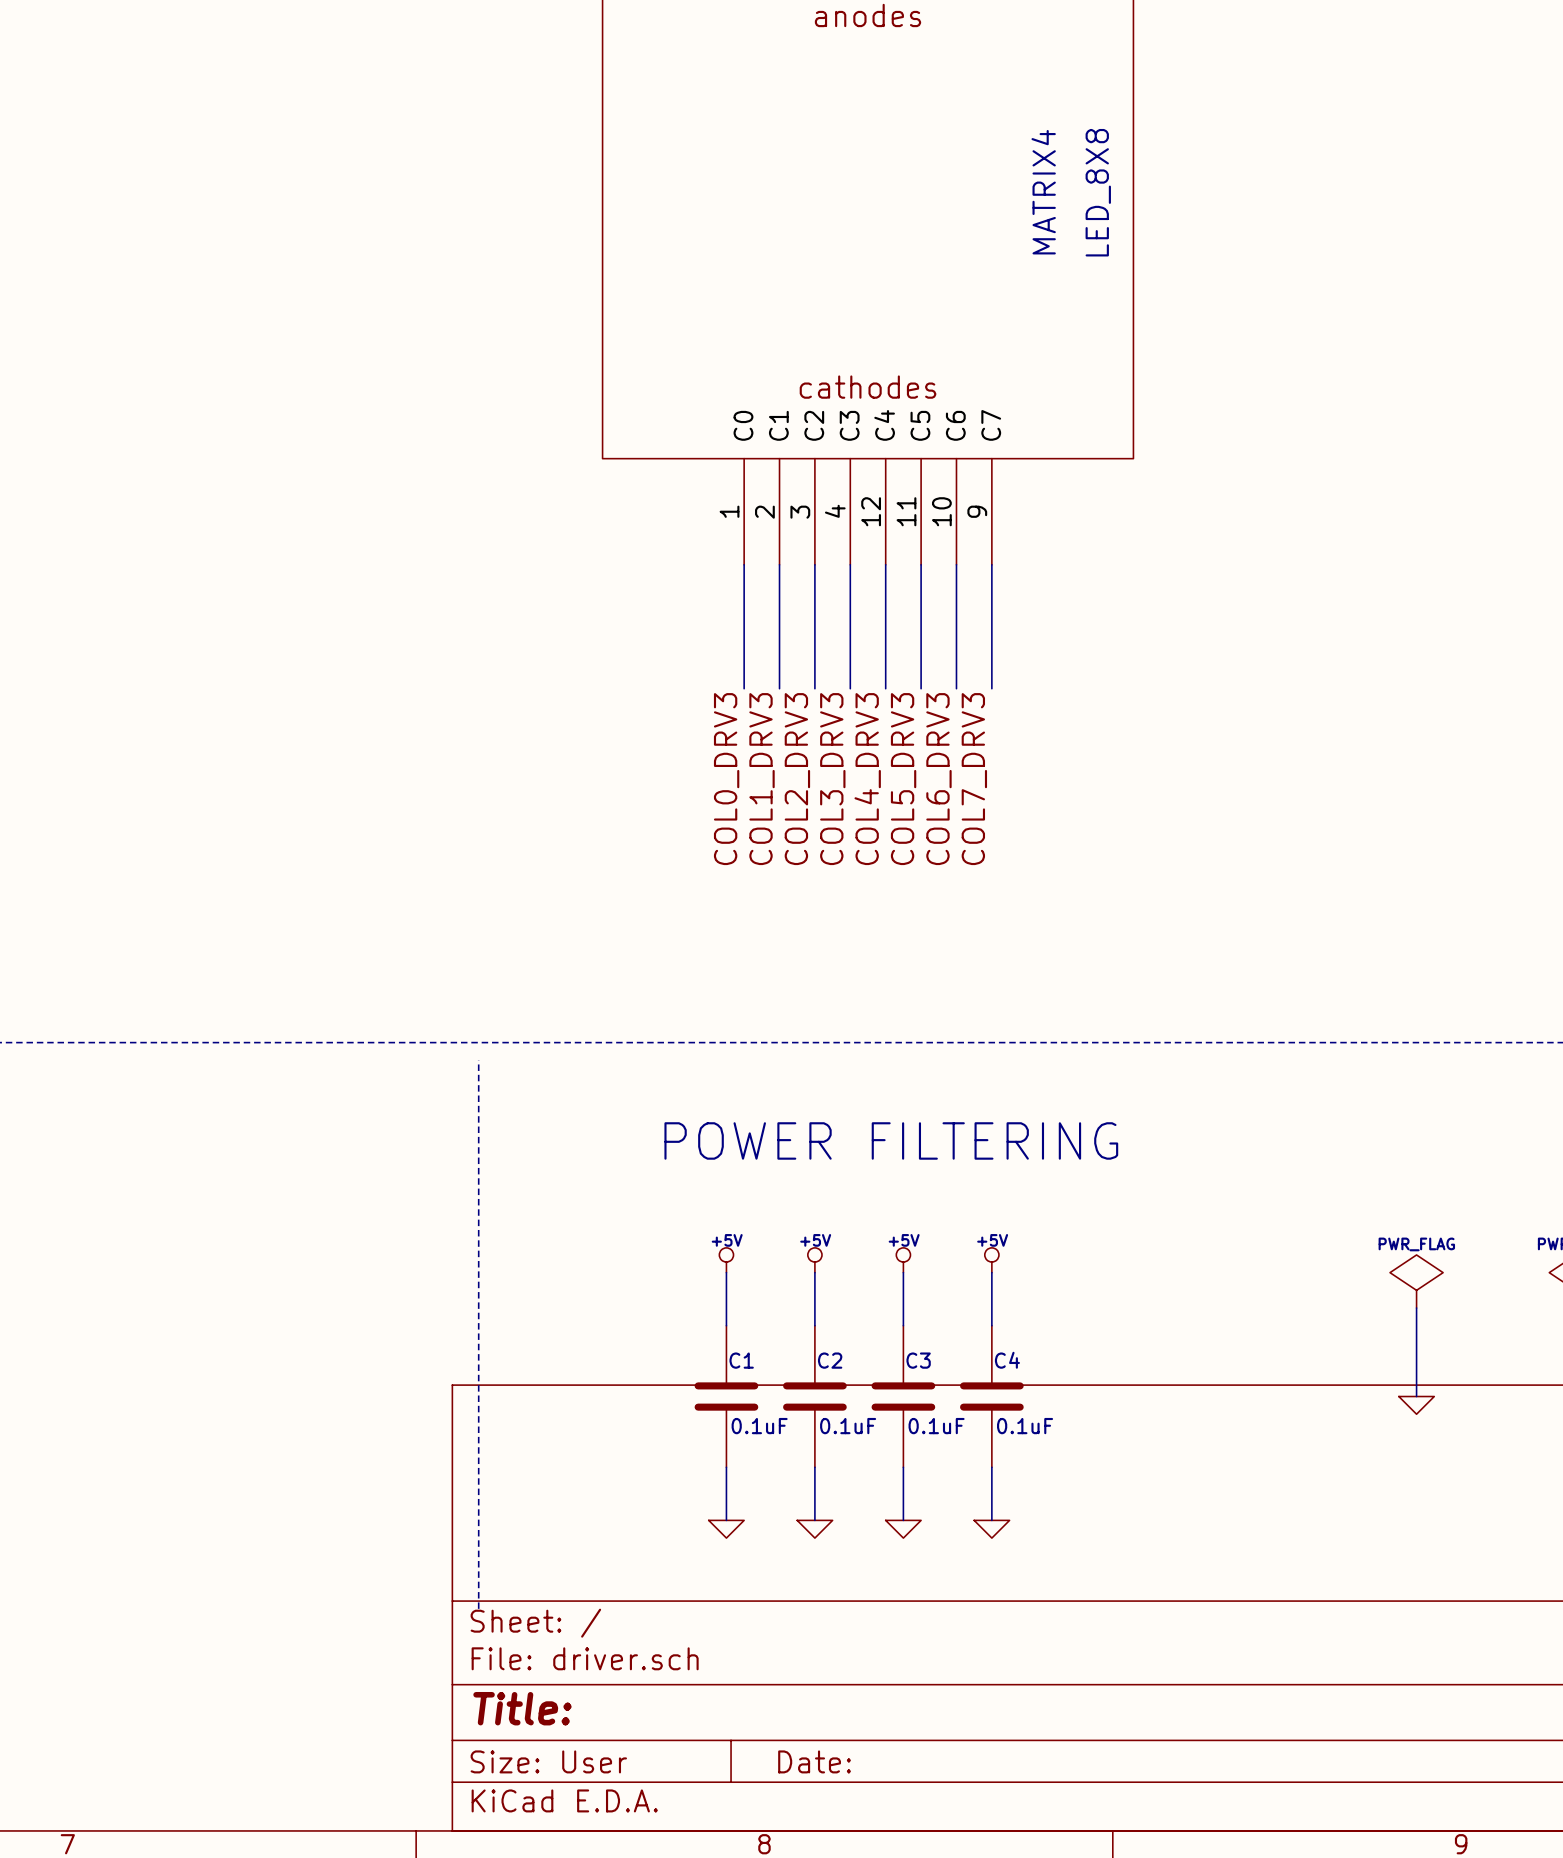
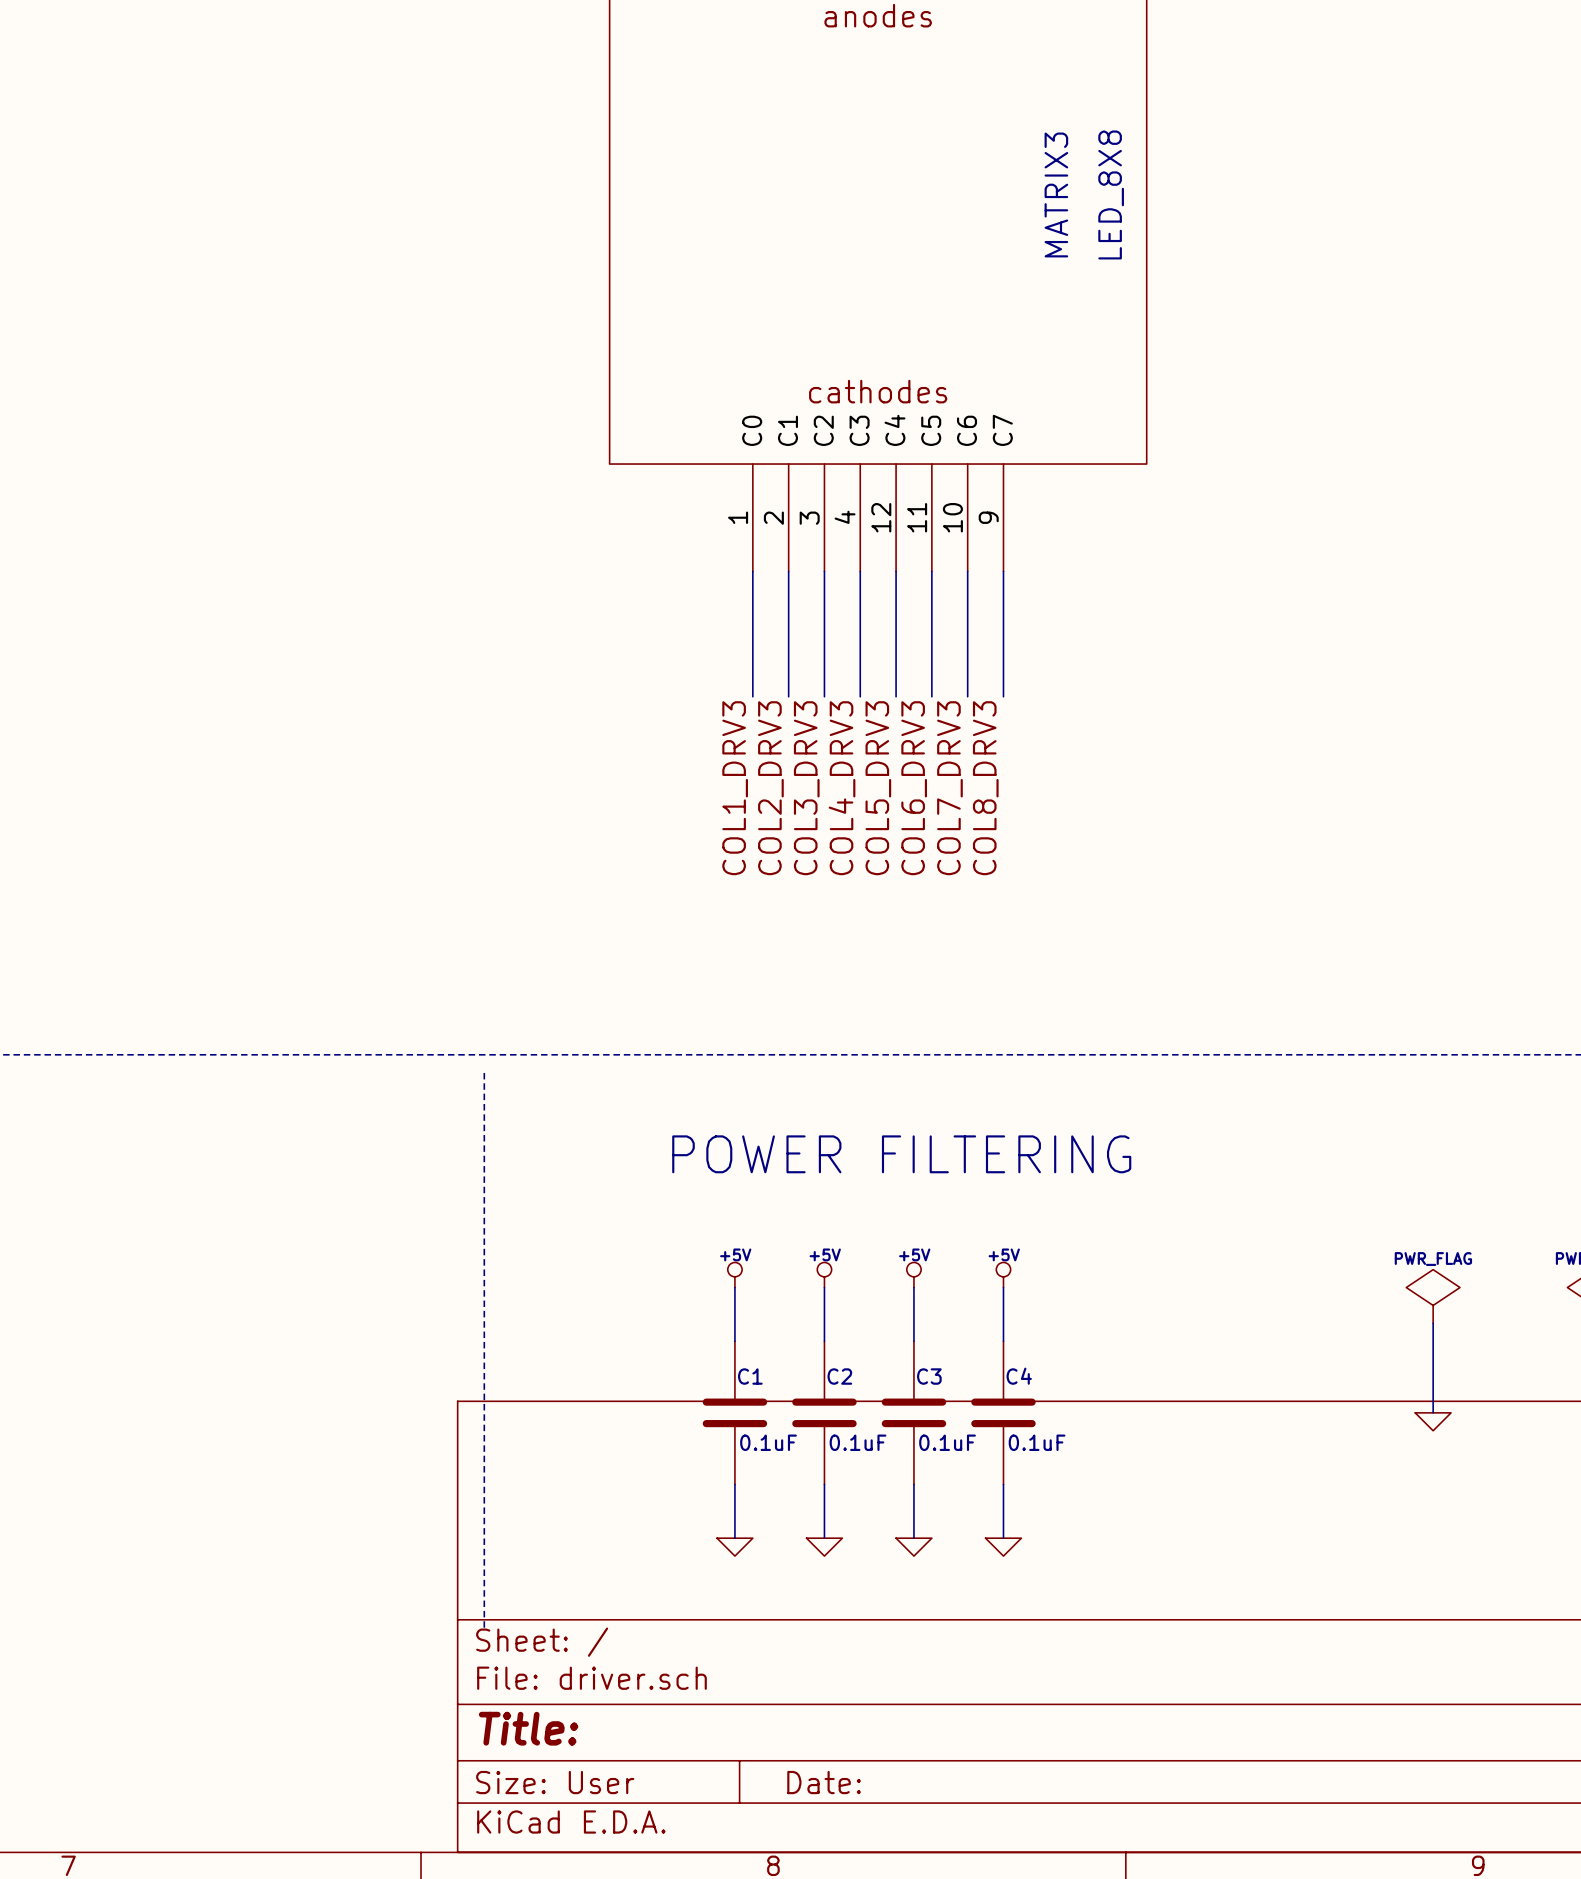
MATRIX4 name: MATRIX4 (1043, 192) -> MATRIX3 (1056, 194)
label: COL0_DRV3 (726, 779) -> COL1_DRV3 (735, 788)
label: COL1_DRV3 (762, 779) -> COL2_DRV3 (770, 788)
label: COL2_DRV3 (797, 779) -> COL3_DRV3 (806, 788)
label: COL3_DRV3 (832, 779) -> COL4_DRV3 (842, 788)
label: COL4_DRV3 (867, 779) -> COL5_DRV3 (878, 788)
label: COL5_DRV3 (903, 779) -> COL6_DRV3 (914, 788)
label: COL6_DRV3 (938, 779) -> COL7_DRV3 (949, 788)
label: COL7_DRV3 (974, 779) -> COL8_DRV3 (985, 788)

